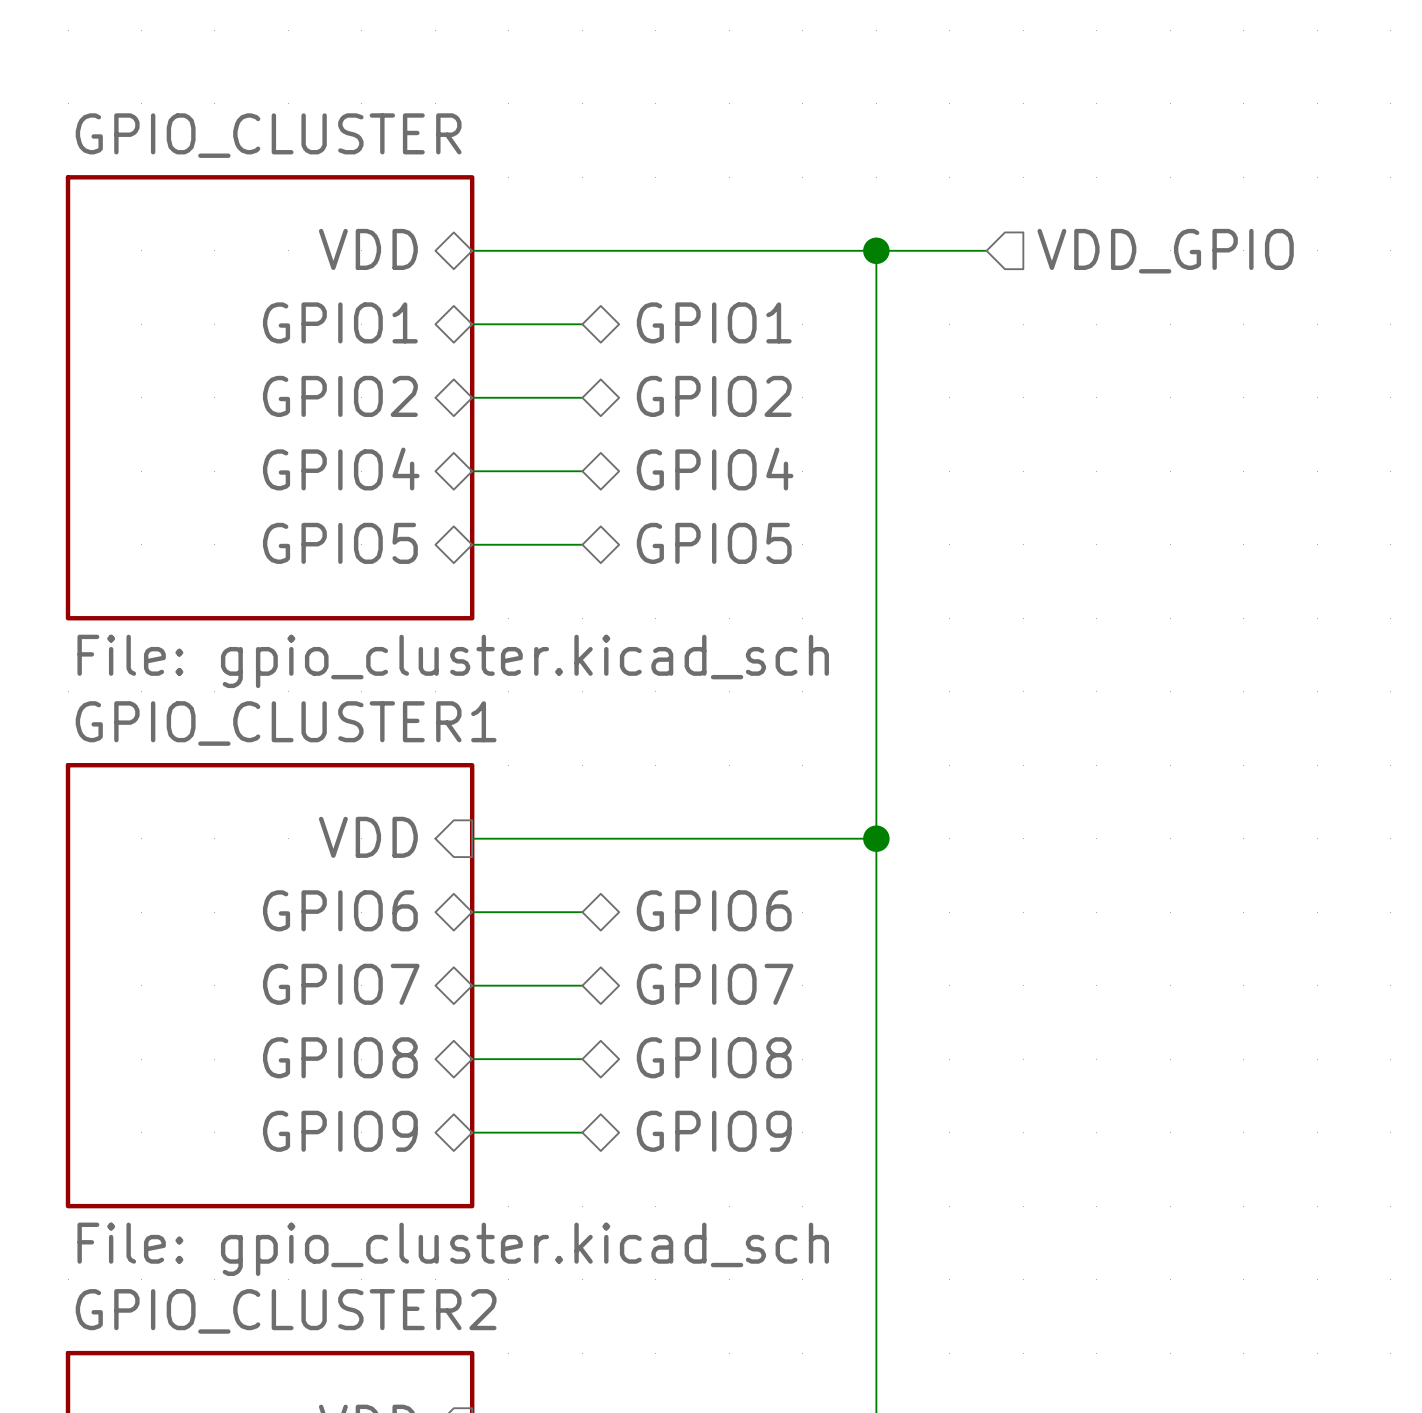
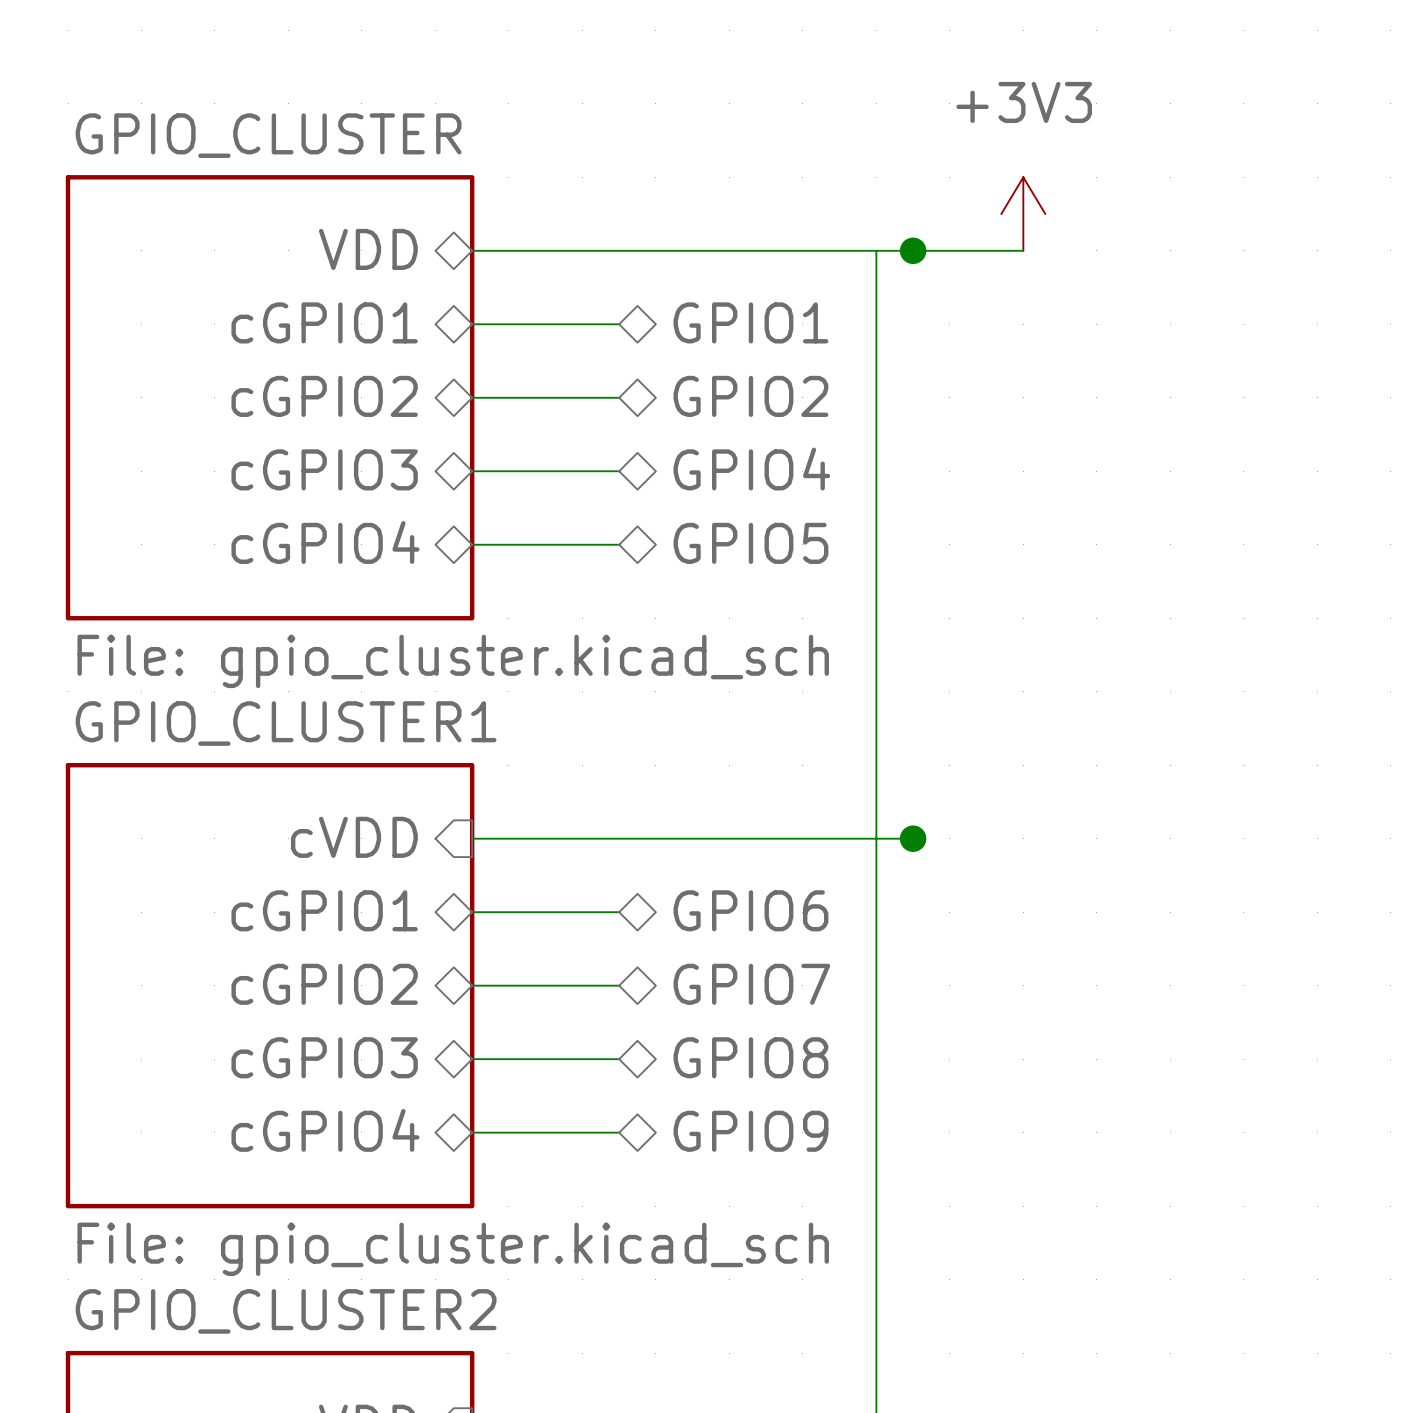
power symbol: none -> +3V3 (1023, 214)
junction position: (876, 250) -> (913, 250)
wire: none -> (986, 250) (1023, 250)
hierarchical label: VDD_GPIO (1165, 251) -> none
sheet pin: GPIO1 (340, 322) -> cGPIO1 (324, 322)
hierarchical label position: GPIO1 (714, 322) -> GPIO1 (750, 322)
wire: none -> (582, 324) (619, 324)
sheet pin: GPIO2 (340, 396) -> cGPIO2 (324, 396)
hierarchical label position: GPIO2 (714, 396) -> GPIO2 (750, 396)
wire: none -> (582, 397) (619, 397)
sheet pin: GPIO4 (341, 469) -> cGPIO3 (324, 469)
hierarchical label position: GPIO4 (715, 469) -> GPIO4 (751, 469)
wire: none -> (582, 471) (619, 471)
sheet pin: GPIO5 (340, 543) -> cGPIO4 (325, 542)
hierarchical label position: GPIO5 (714, 543) -> GPIO5 (750, 543)
wire: none -> (582, 544) (619, 544)
sheet pin: VDD (368, 837) -> cVDD (354, 837)
wire: none -> (876, 838) (913, 838)
junction position: (876, 838) -> (913, 838)
sheet pin: GPIO6 (340, 910) -> cGPIO1 (324, 910)
hierarchical label position: GPIO6 (714, 910) -> GPIO6 (750, 910)
wire: none -> (582, 912) (619, 912)
sheet pin: GPIO7 (341, 984) -> cGPIO2 (324, 984)
hierarchical label position: GPIO7 (715, 984) -> GPIO7 (751, 984)
wire: none -> (582, 985) (619, 985)
sheet pin: GPIO8 (340, 1057) -> cGPIO3 (324, 1057)
hierarchical label position: GPIO8 (714, 1057) -> GPIO8 (750, 1057)
wire: none -> (582, 1059) (619, 1059)
sheet pin: GPIO9 (340, 1131) -> cGPIO4 (325, 1130)
hierarchical label position: GPIO9 (714, 1131) -> GPIO9 (750, 1131)
wire: none -> (582, 1132) (619, 1132)

